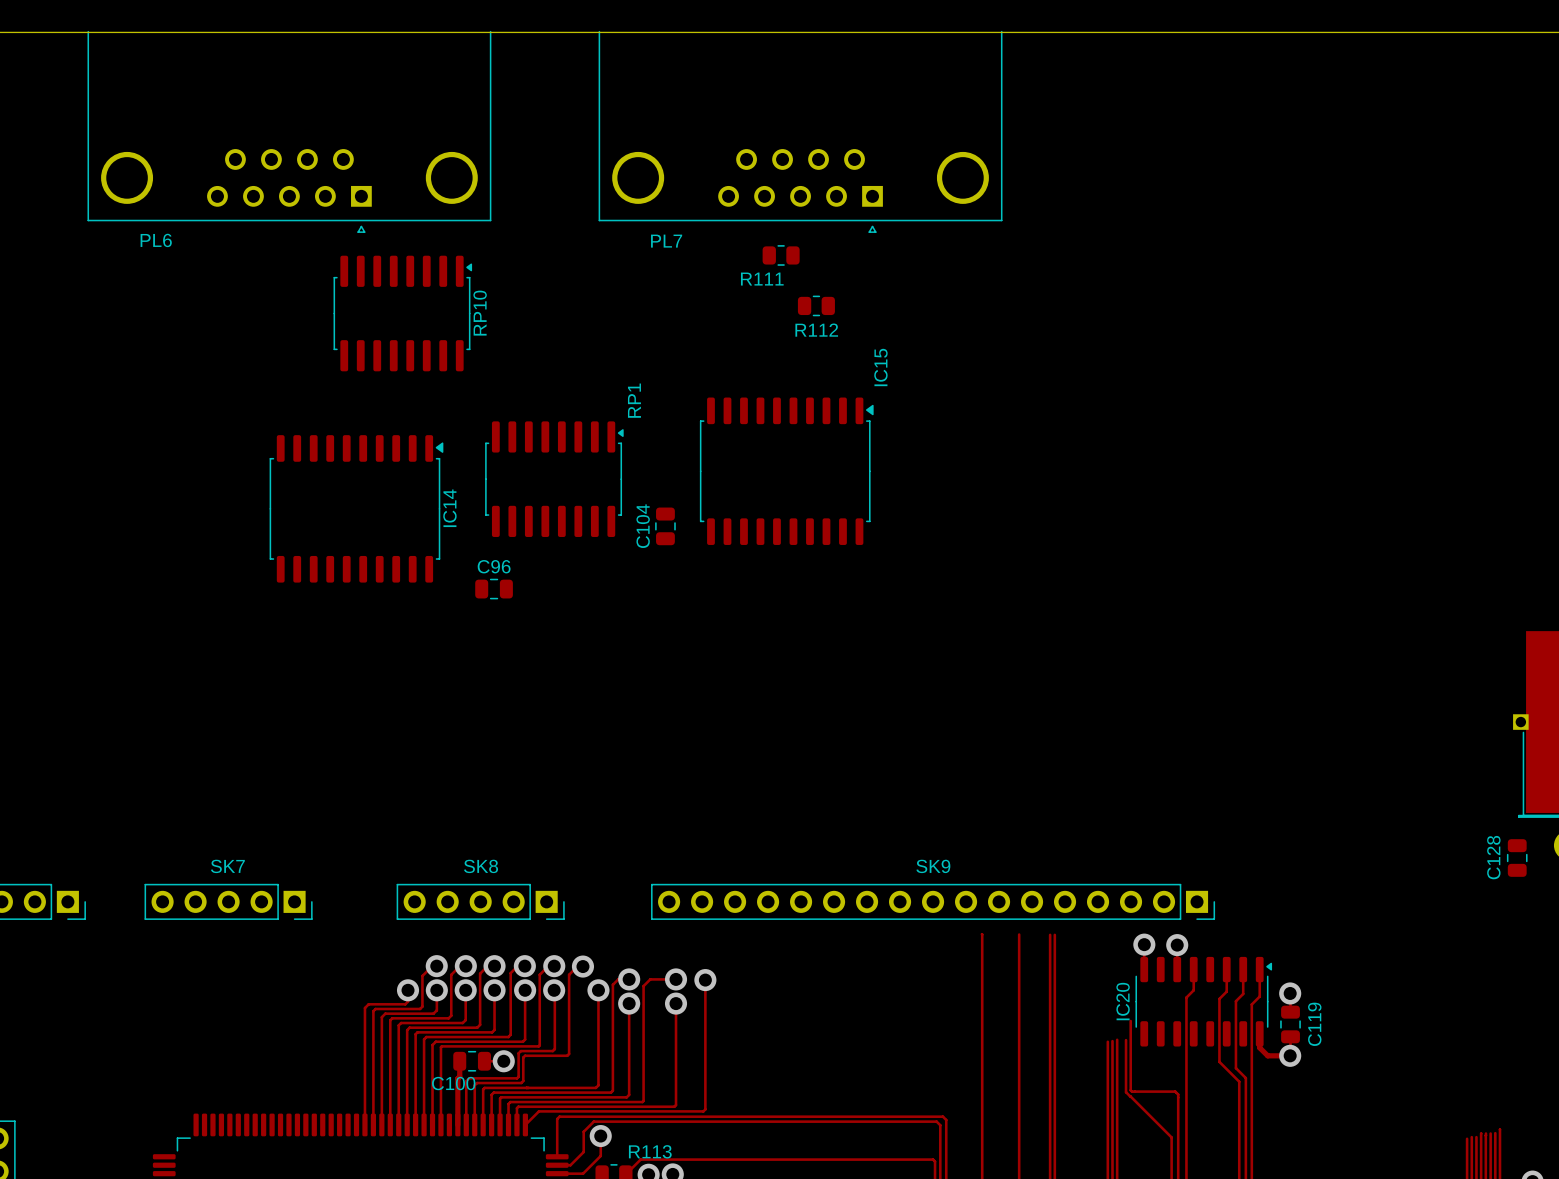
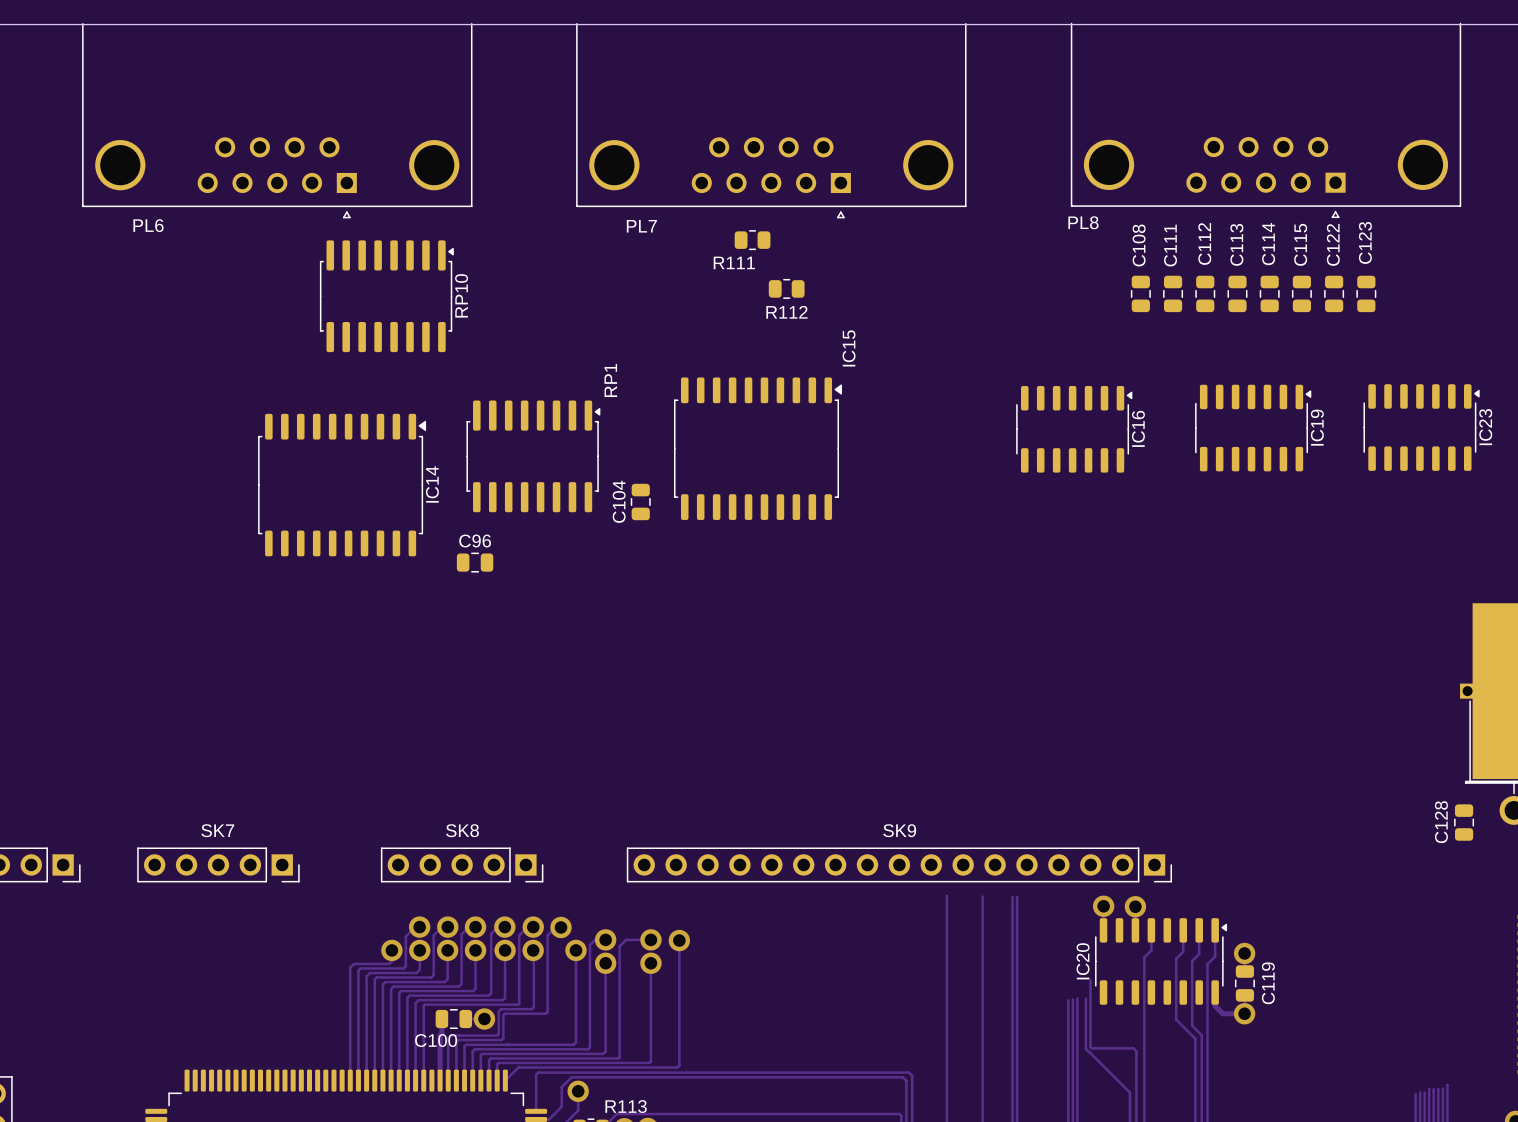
PL8: none -> (1265, 120)
C108: none -> (1140, 293)
C111: none -> (1173, 293)
C112: none -> (1205, 293)
C113: none -> (1237, 293)
C114: none -> (1269, 293)
C115: none -> (1301, 293)
C122: none -> (1334, 293)
C123: none -> (1366, 293)
IC19: none -> (1253, 428)
IC23: none -> (1421, 427)
IC16: none -> (1074, 429)

